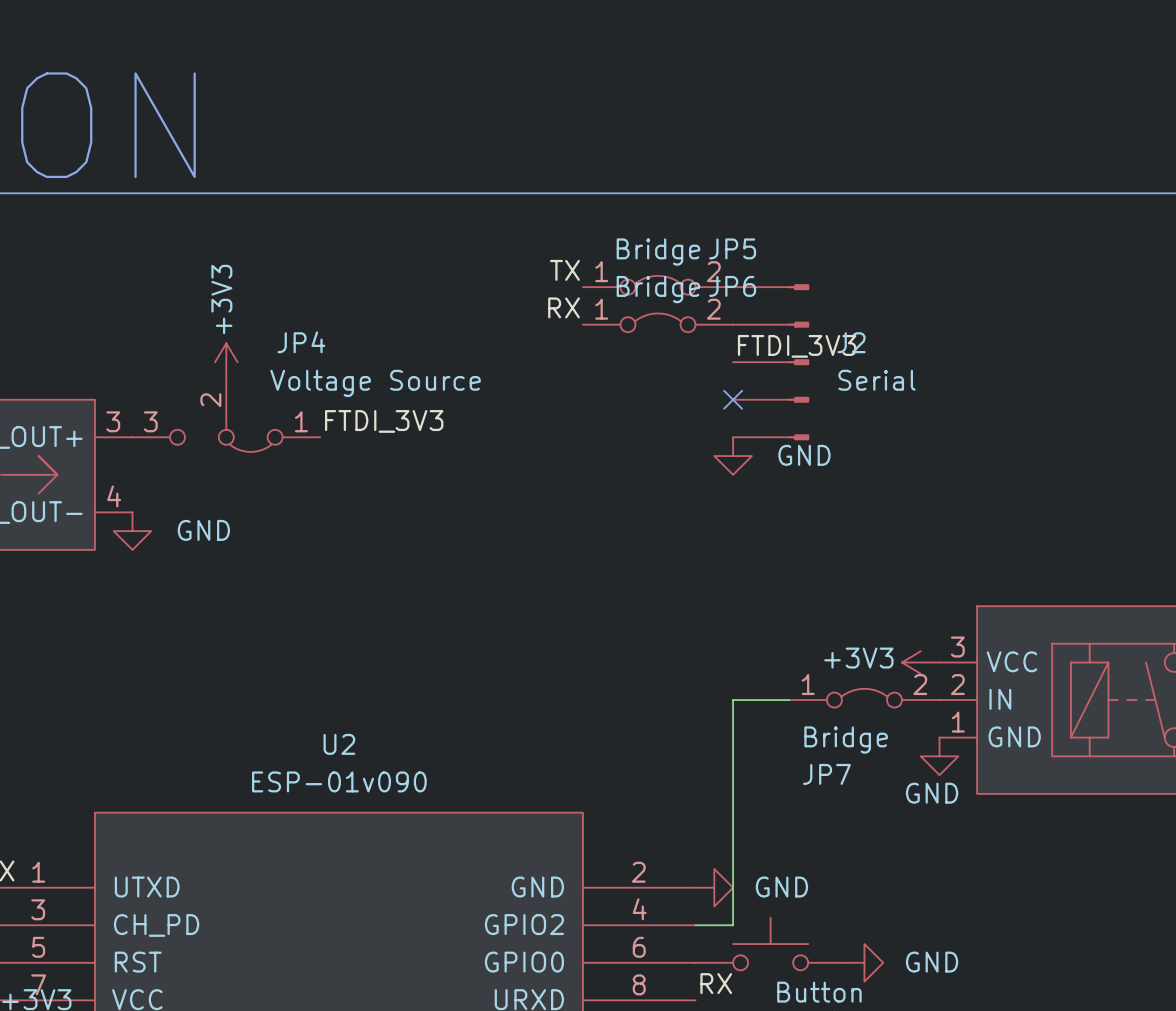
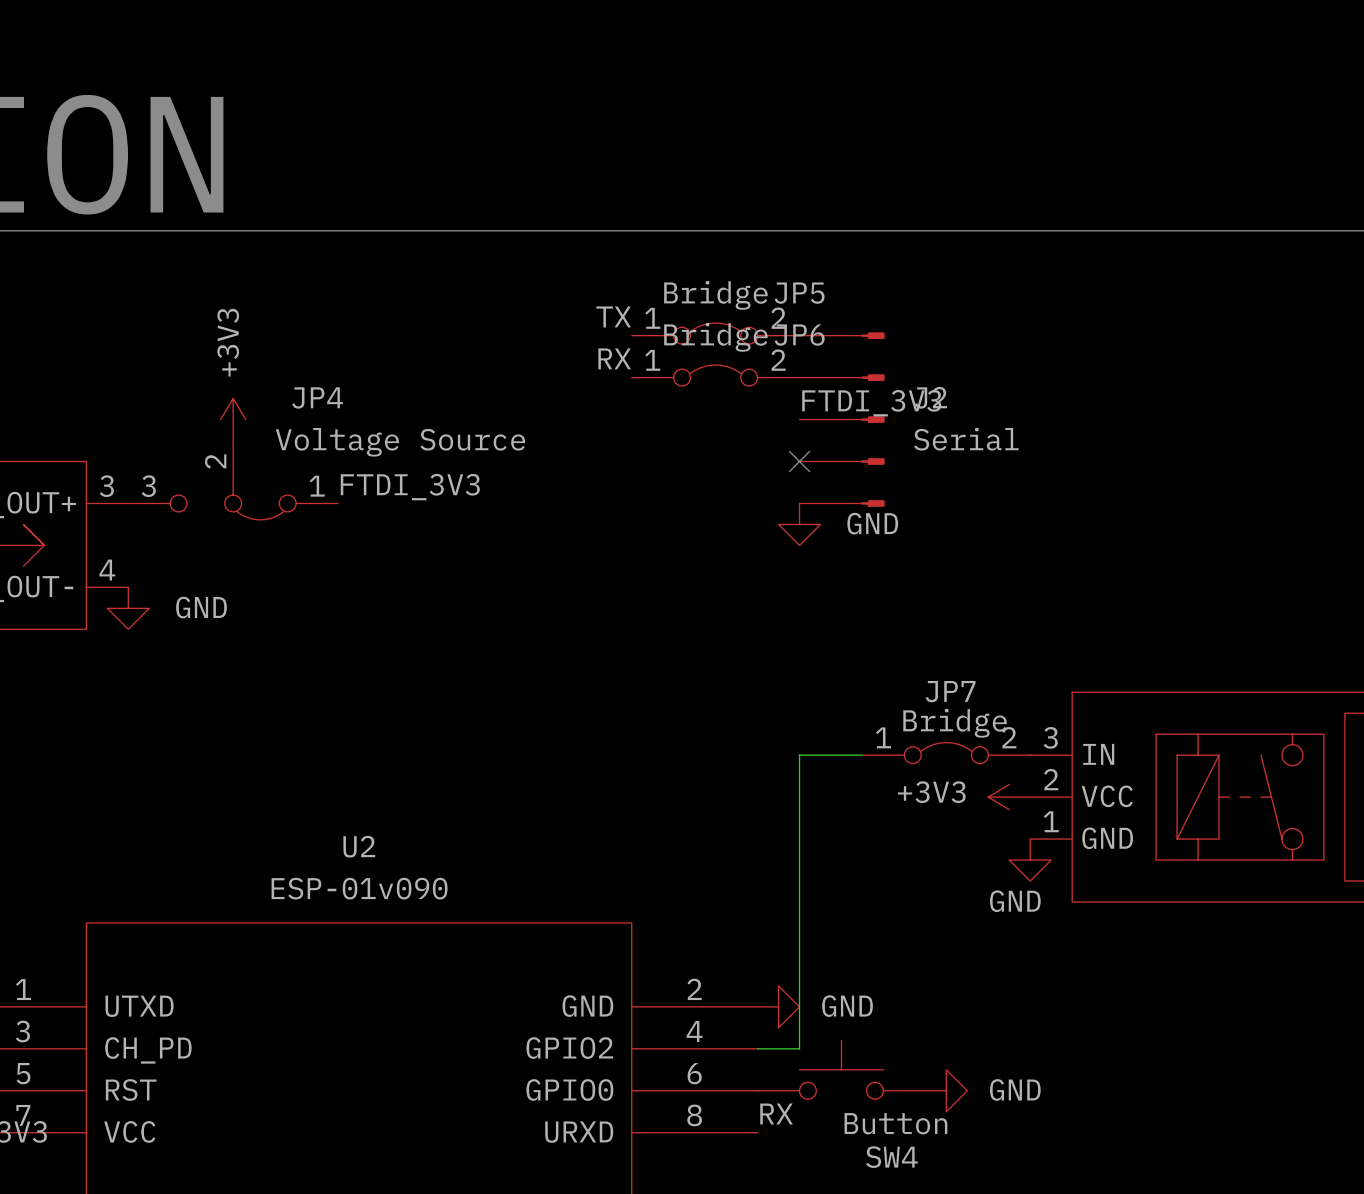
part pin name: VCC (1011, 661) -> IN (1098, 754)
power symbol position: +3V3 (920, 662) -> +3V3 (1009, 797)
JP7 position: (864, 698) -> (946, 753)
part pin name: IN (1000, 699) -> VCC (1107, 796)
wire: (733, 700) (789, 700) -> (799, 797) (799, 755) (862, 755)
JP7 value position: Bridge (846, 740) -> Bridge (955, 723)
JP7 name position: JP7 (826, 774) -> JP7 (950, 691)

